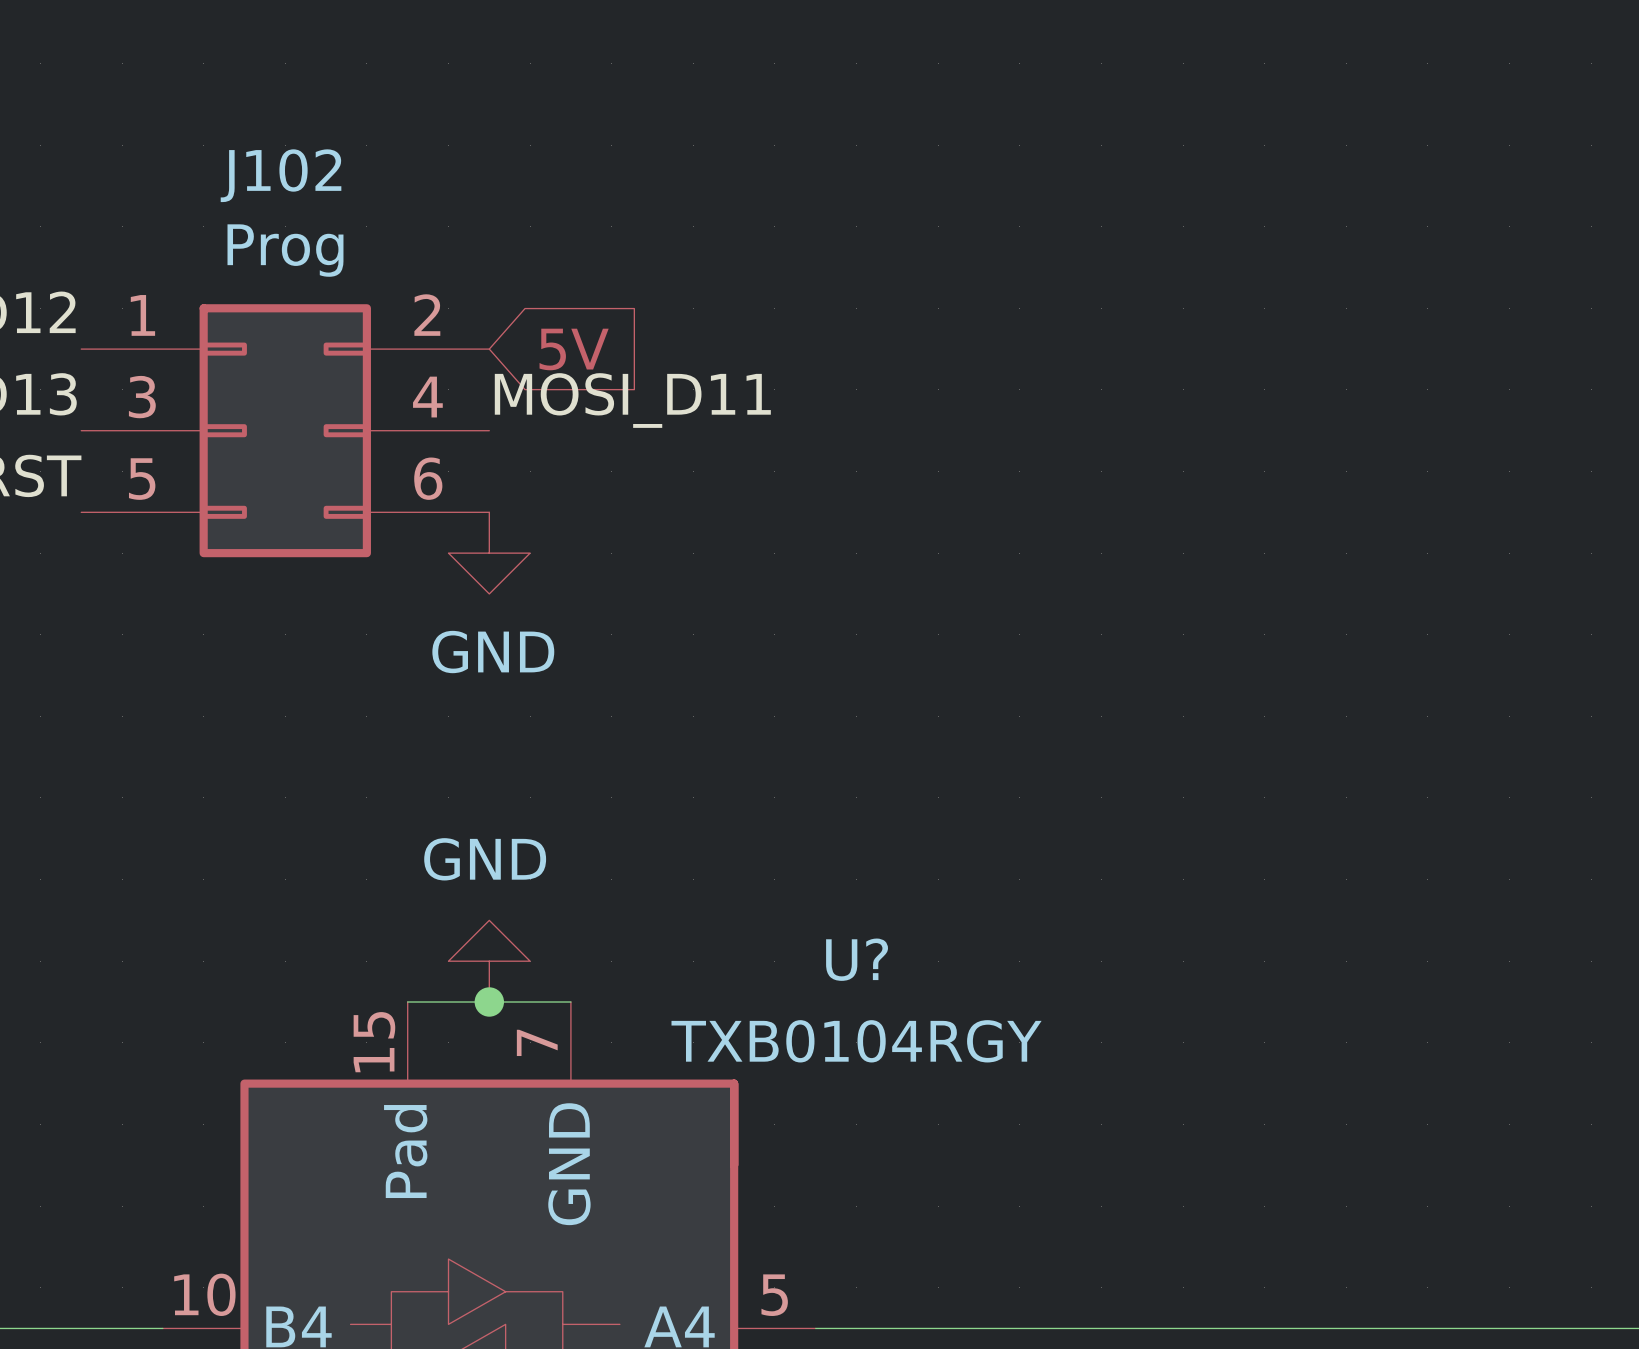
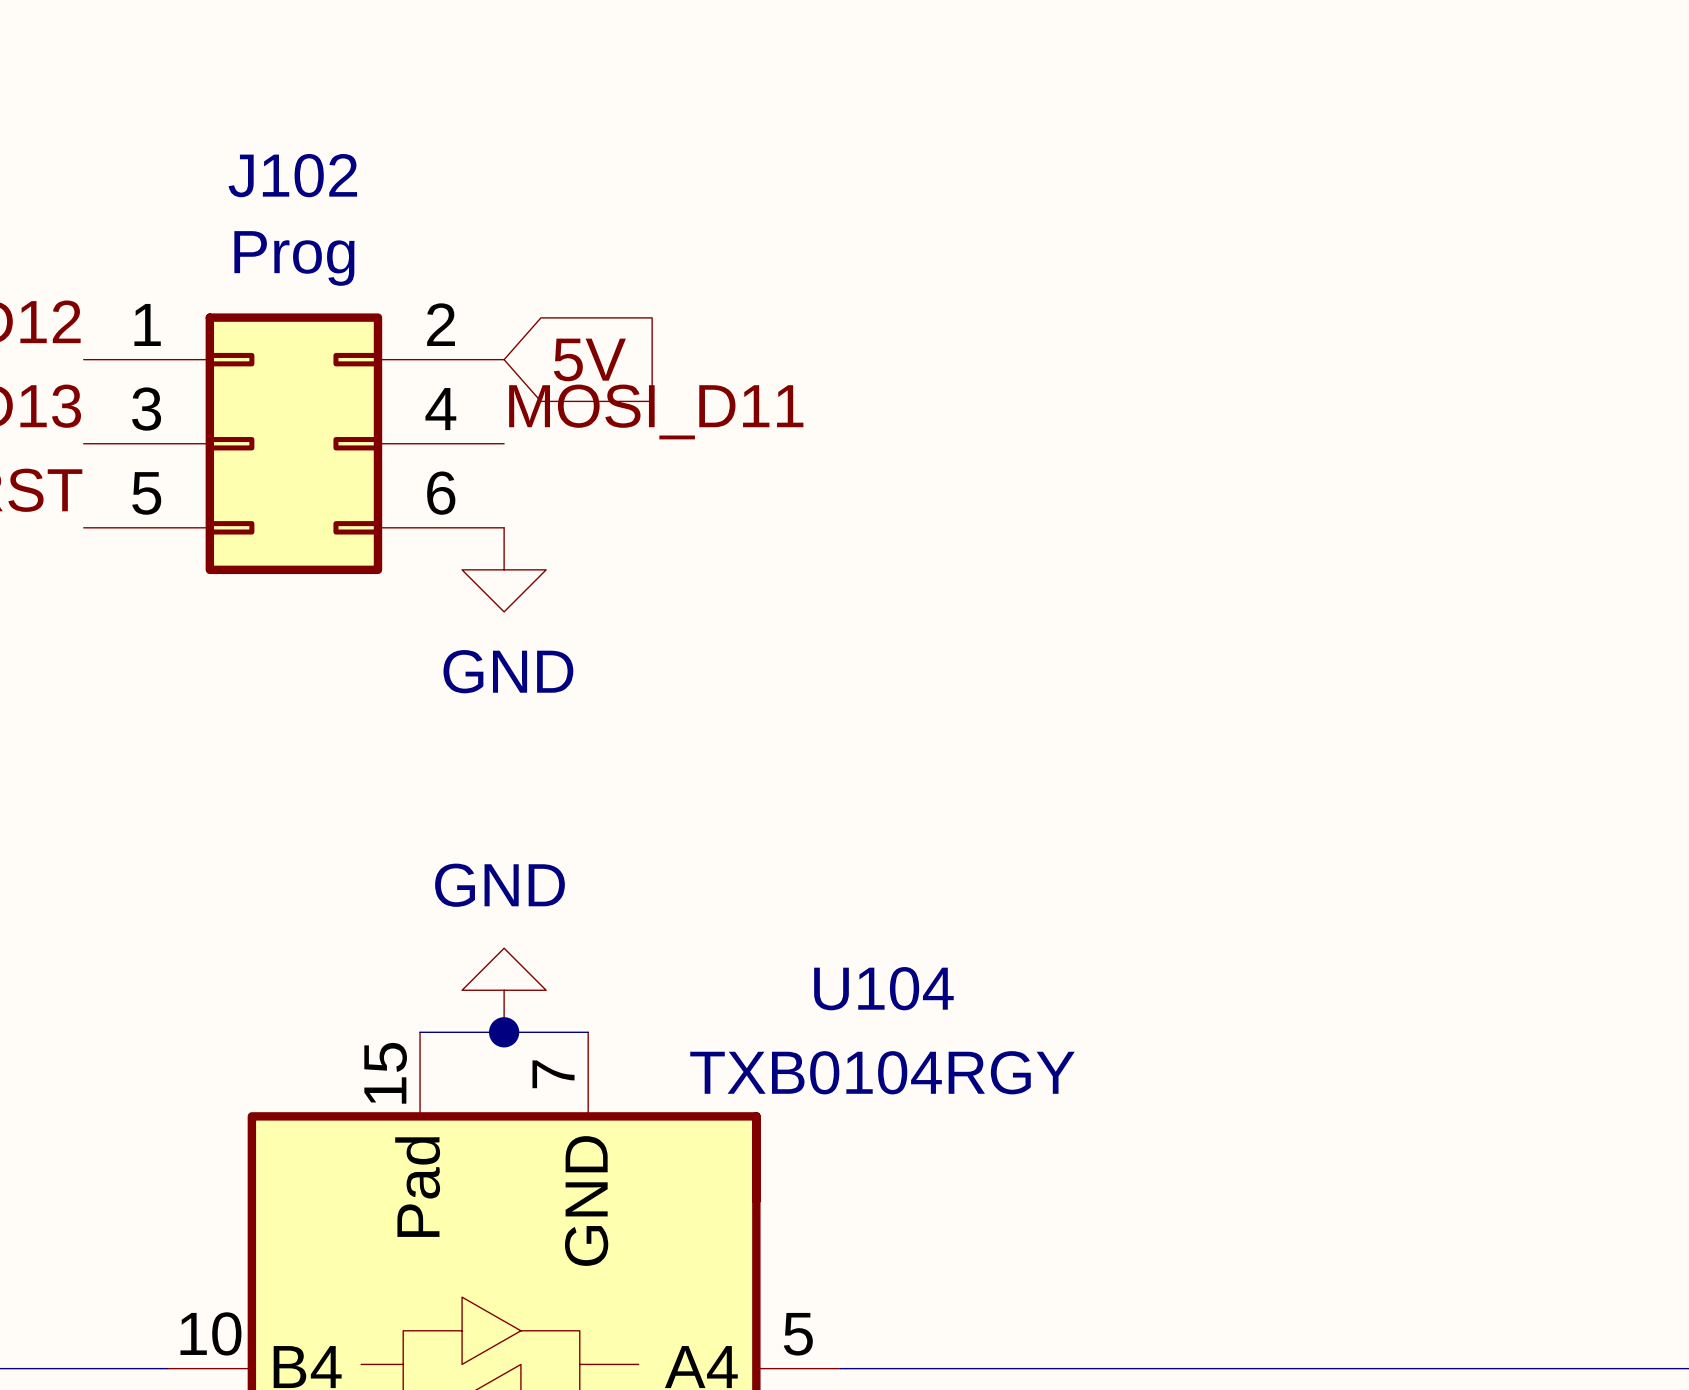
U? name: U? (857, 959) -> U104 (883, 988)

